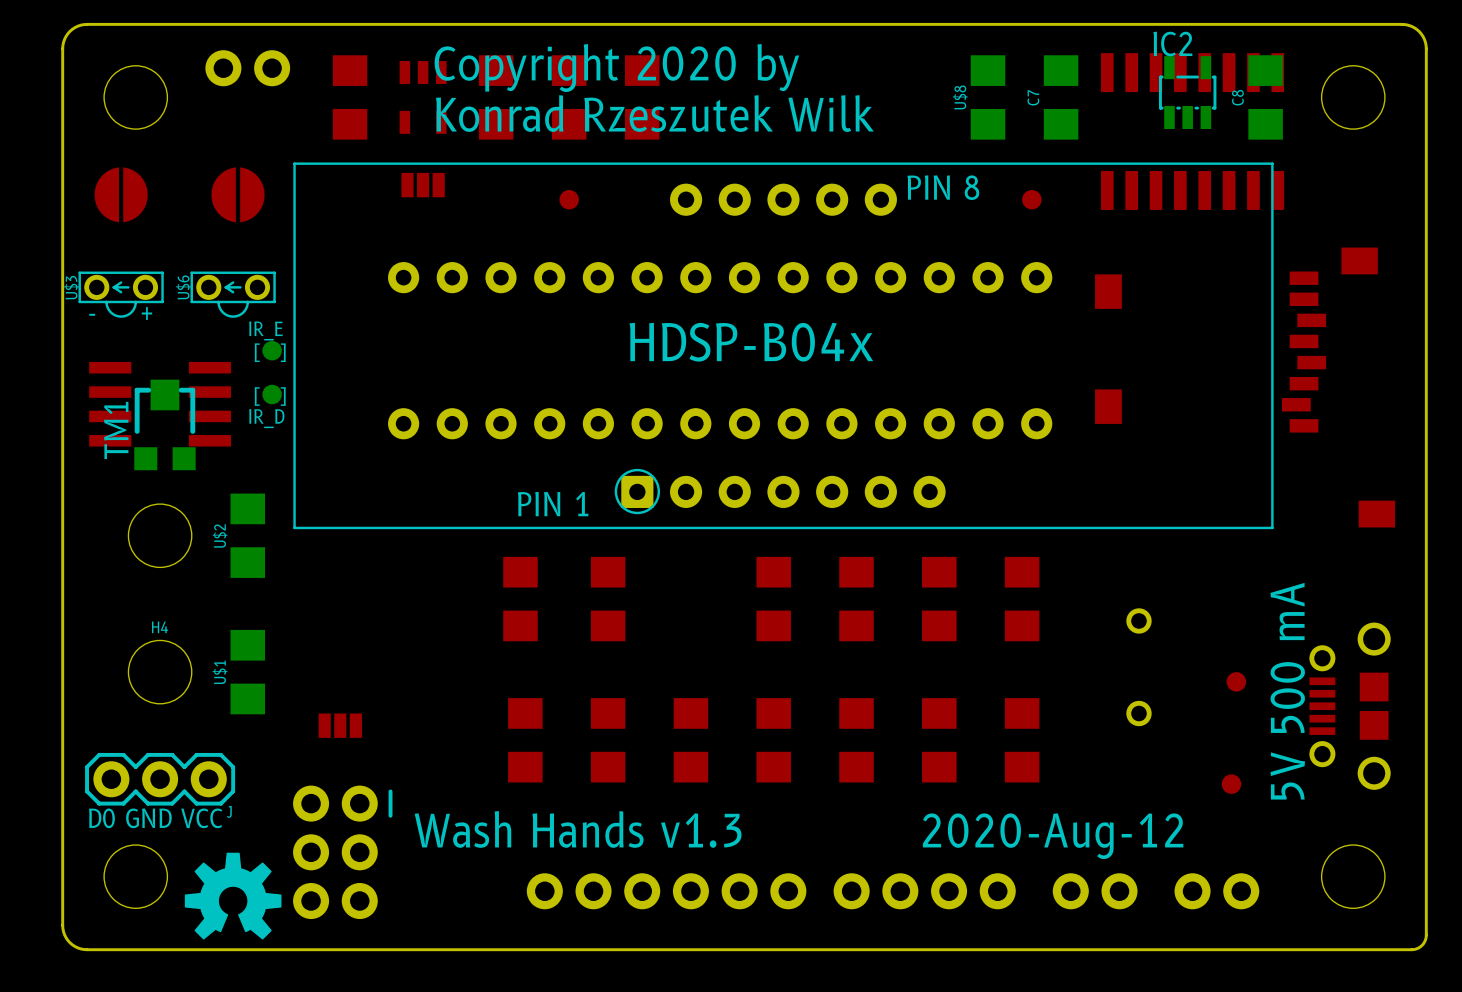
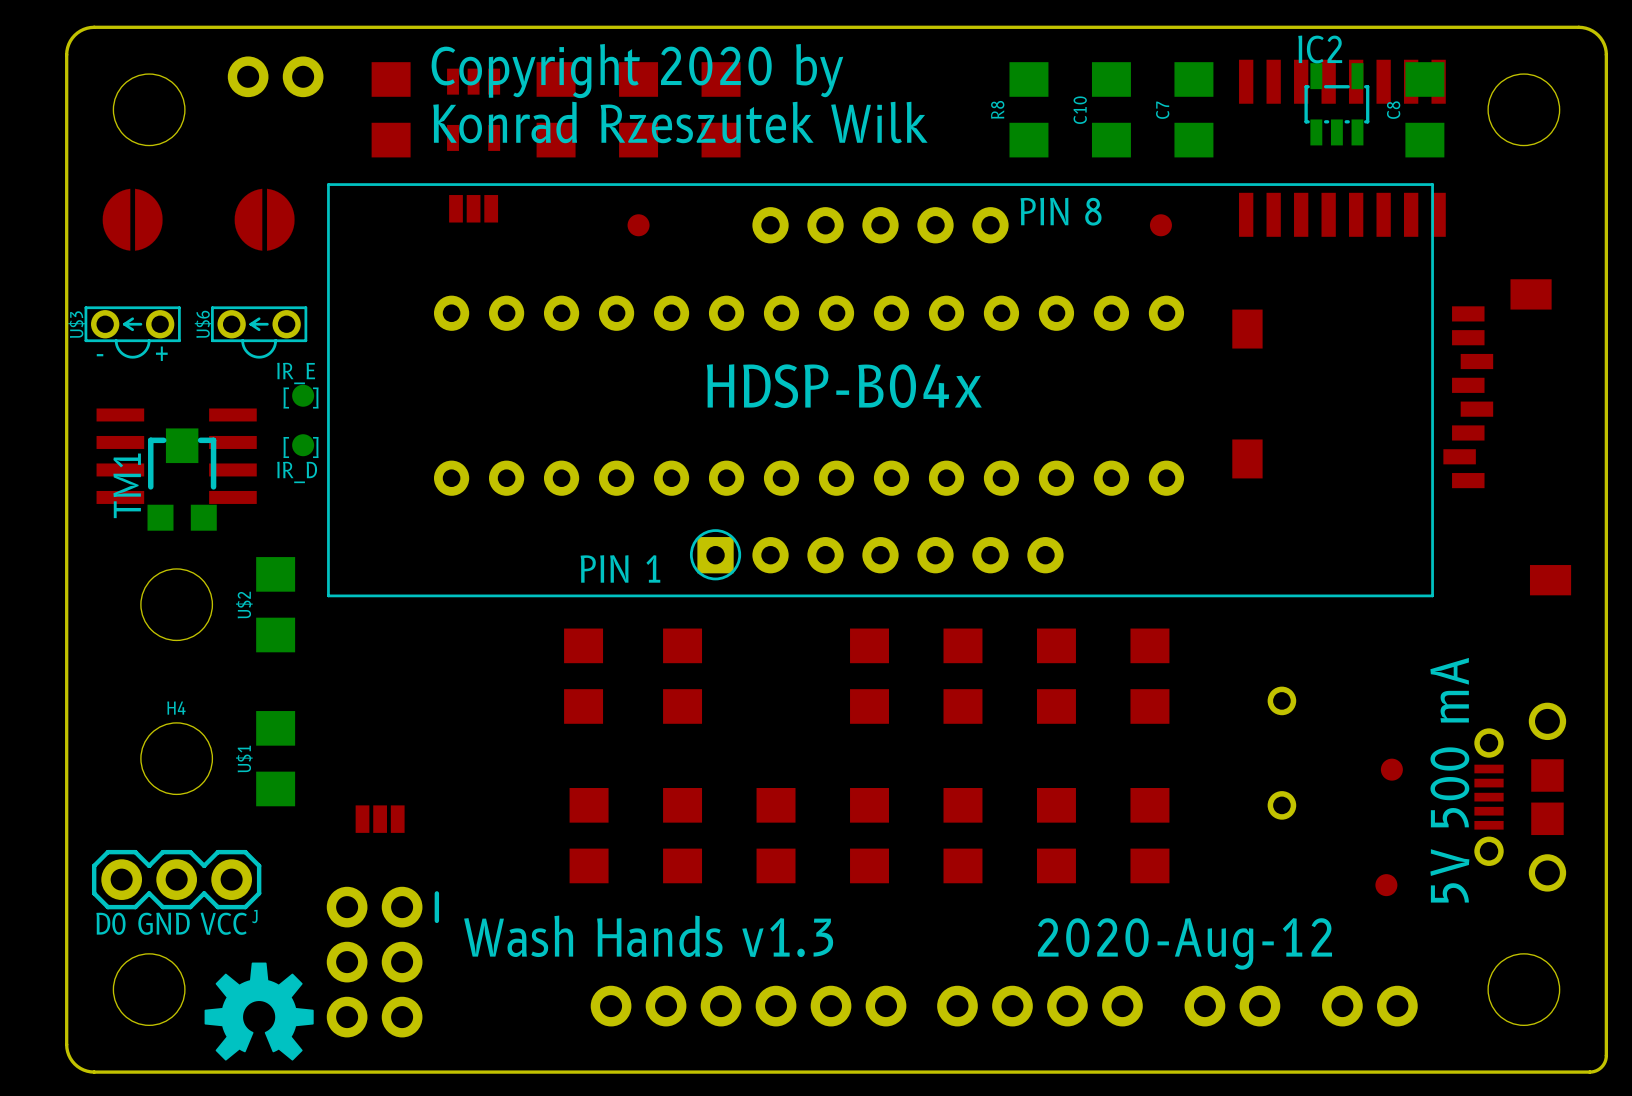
text position: Copyright 2020 by (616, 68) -> Copyright 2020 by (637, 71)
R8: none -> (1028, 109)
U$8 name: U$8 (960, 97) -> C10 (1080, 110)
text position: Konrad Rzeszutek Wilk (654, 113) -> Konrad Rzeszutek Wilk (680, 122)

